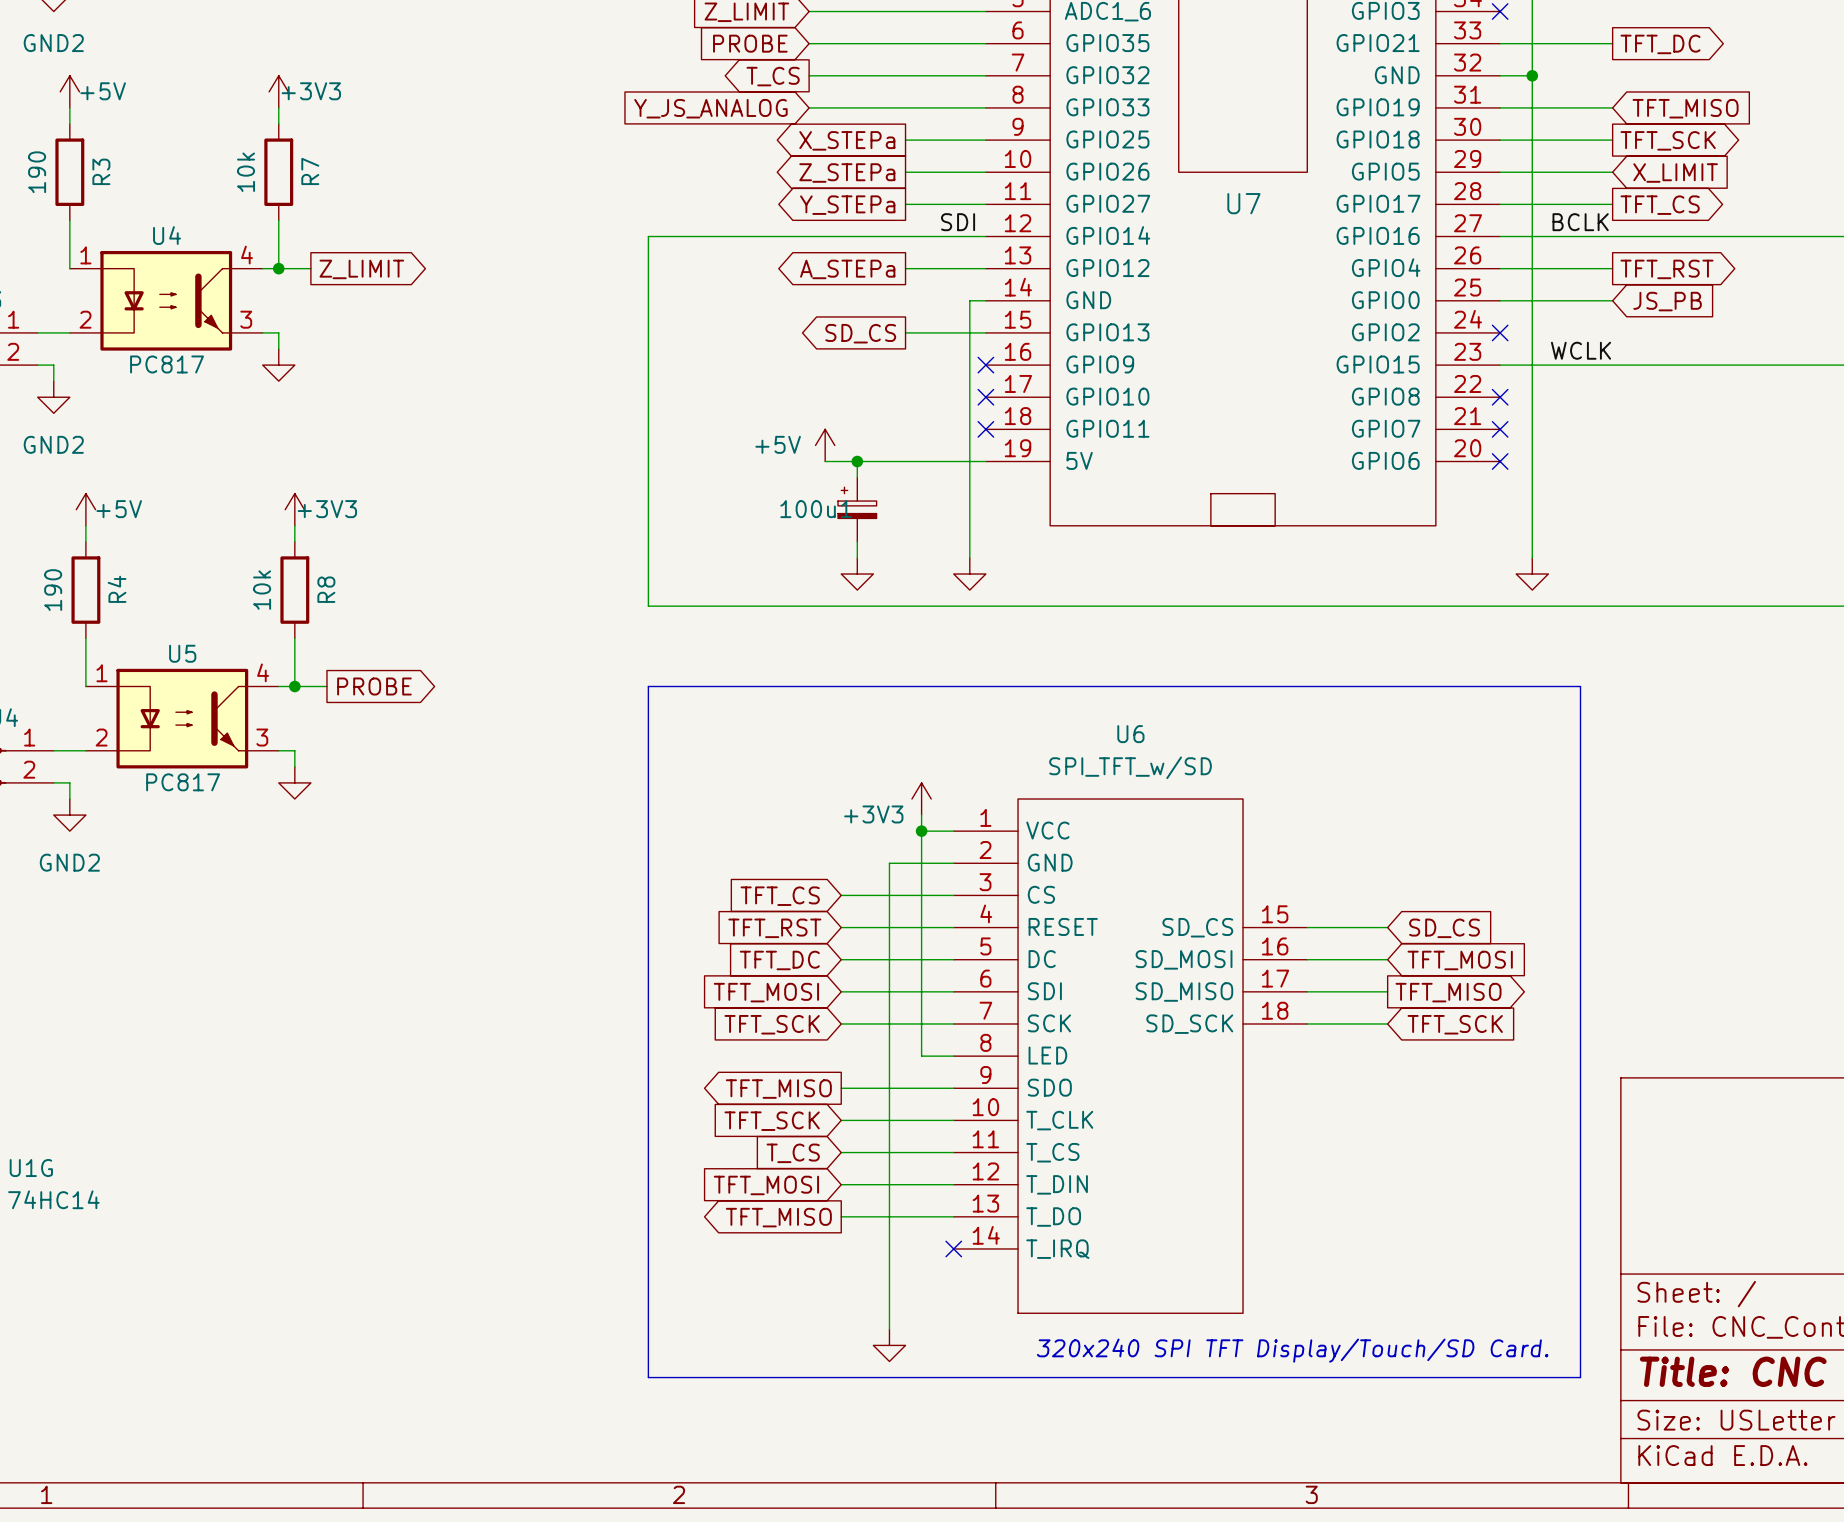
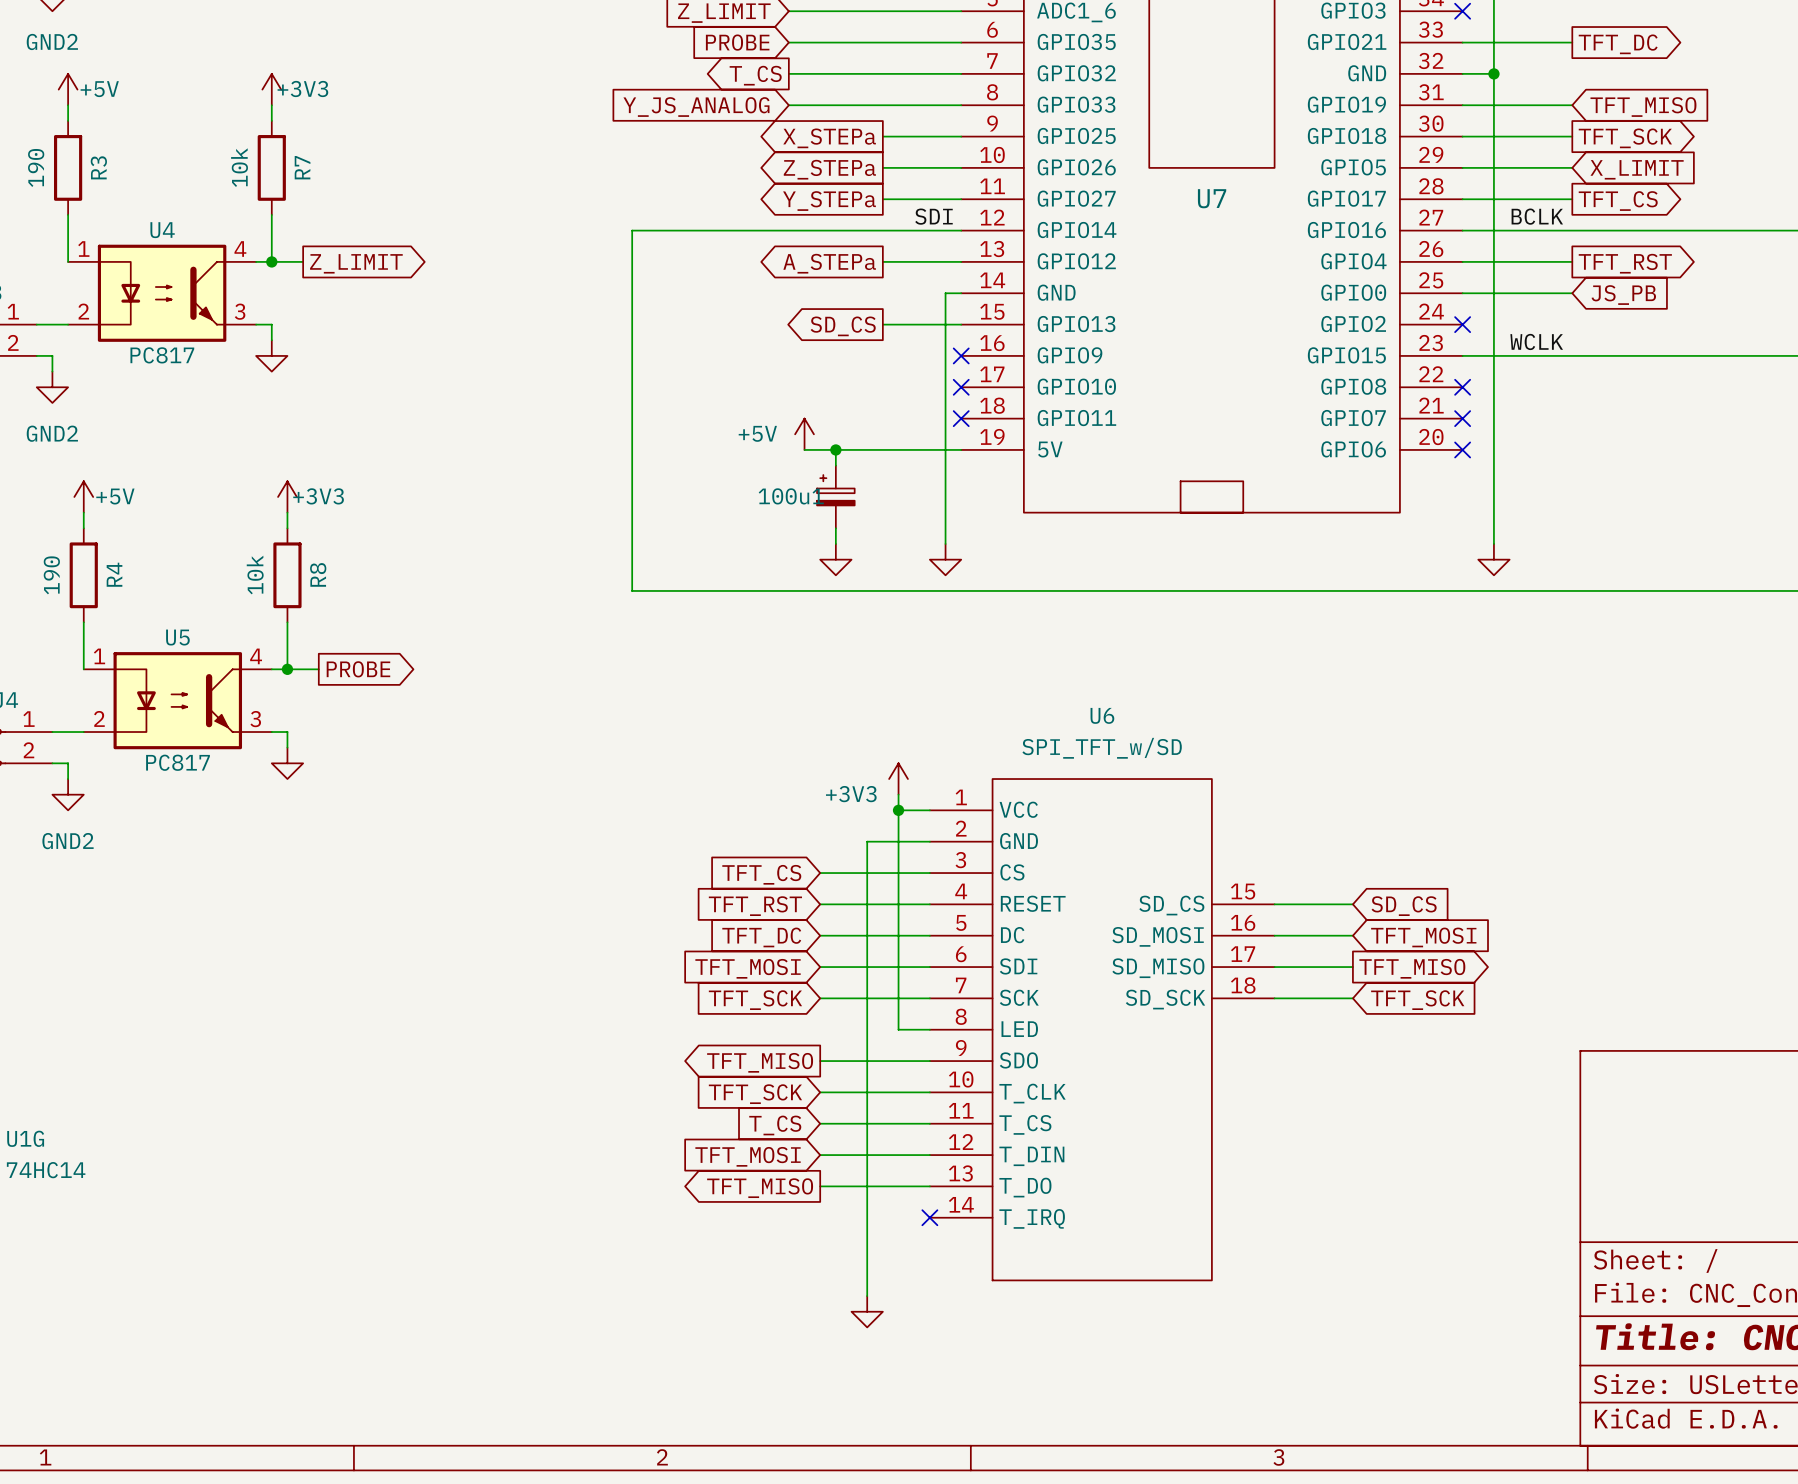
line: (648, 686) (1580, 686) (1580, 1377) (648, 1377) (648, 686) -> none
text: 320x240 SPI TFT Display/Touch/SD Card. (1292, 1350) -> none

